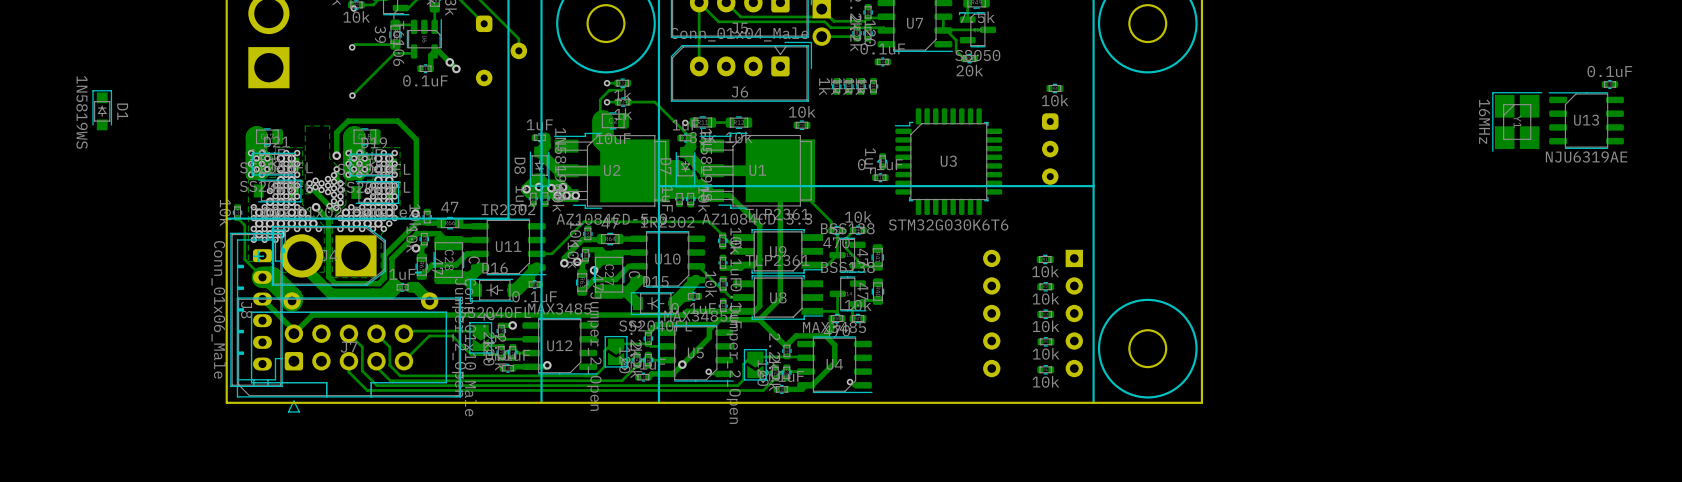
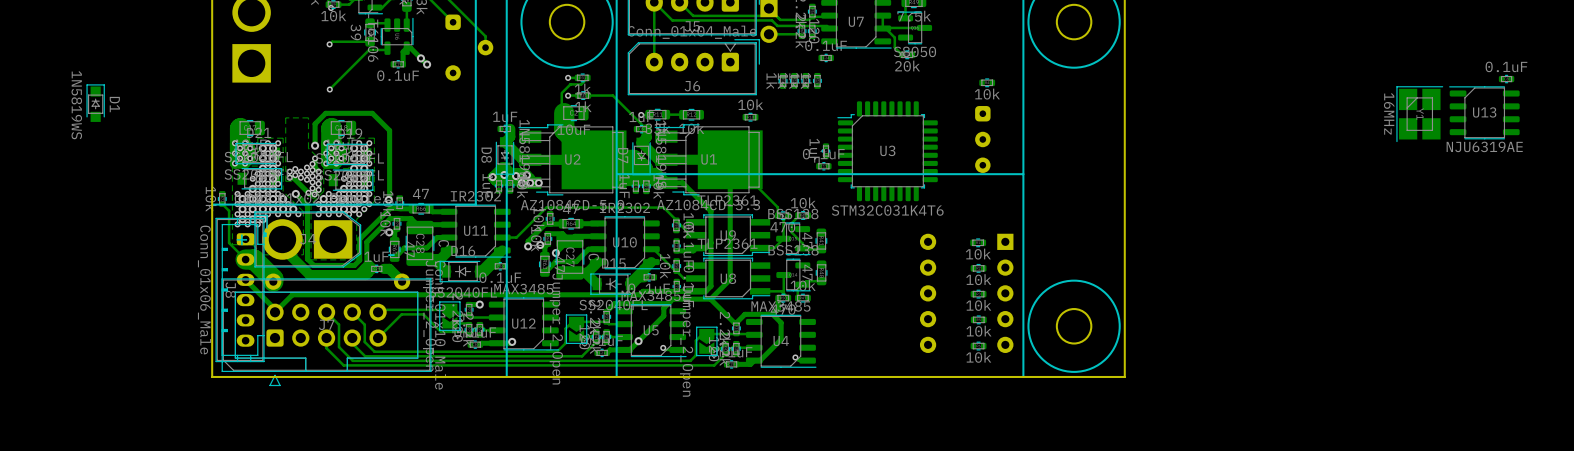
U3 value: STM32G030K6T6 (948, 224) -> STM32C031K4T6 (887, 210)

